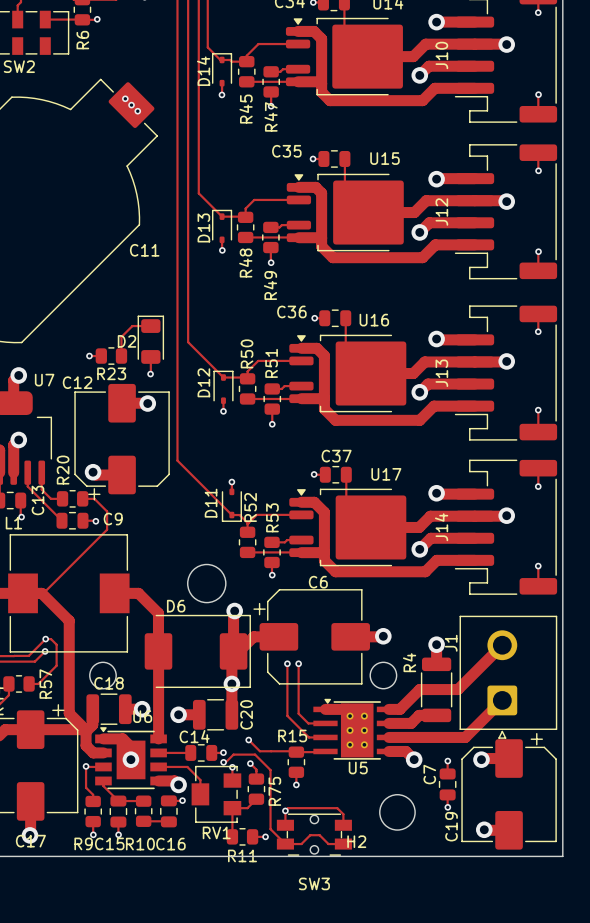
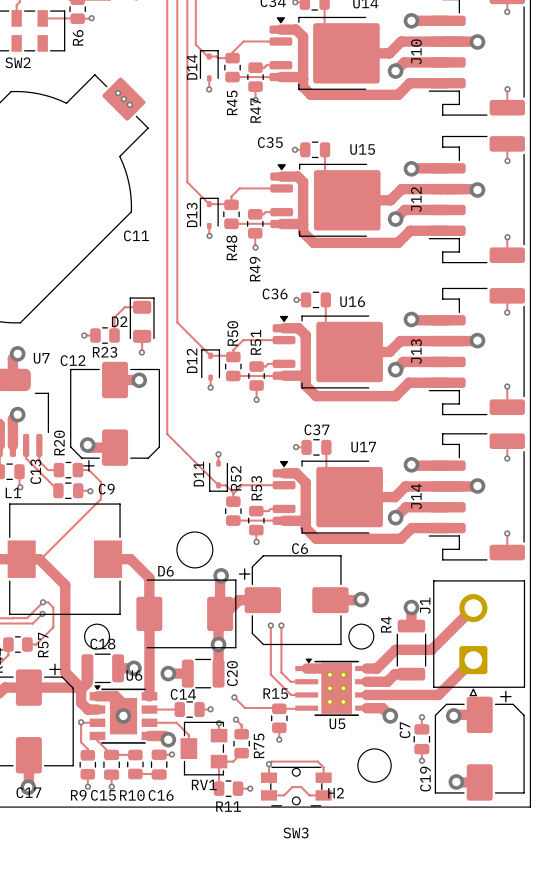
track: (223, 762) (233, 754) (255, 754) (270, 770) (270, 829) (285, 844) -> none
via: (223, 762) -> none

